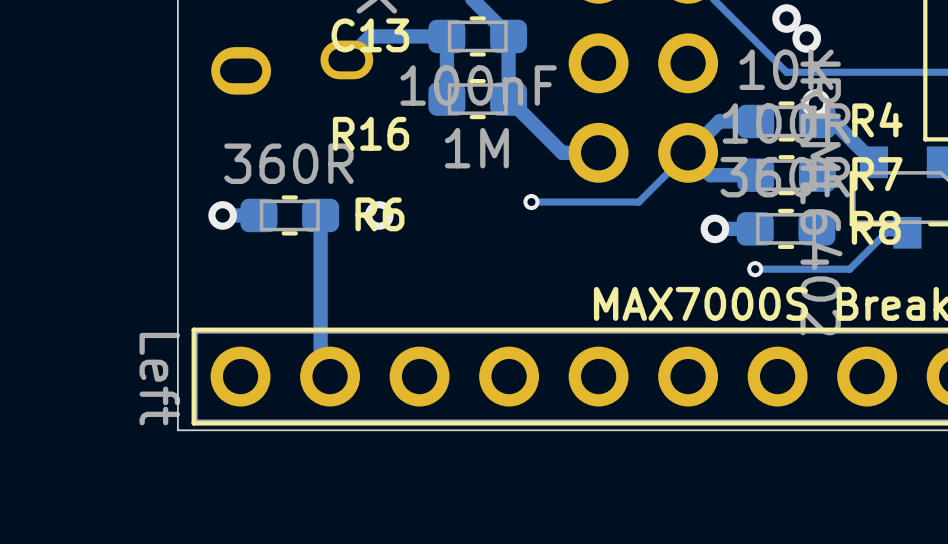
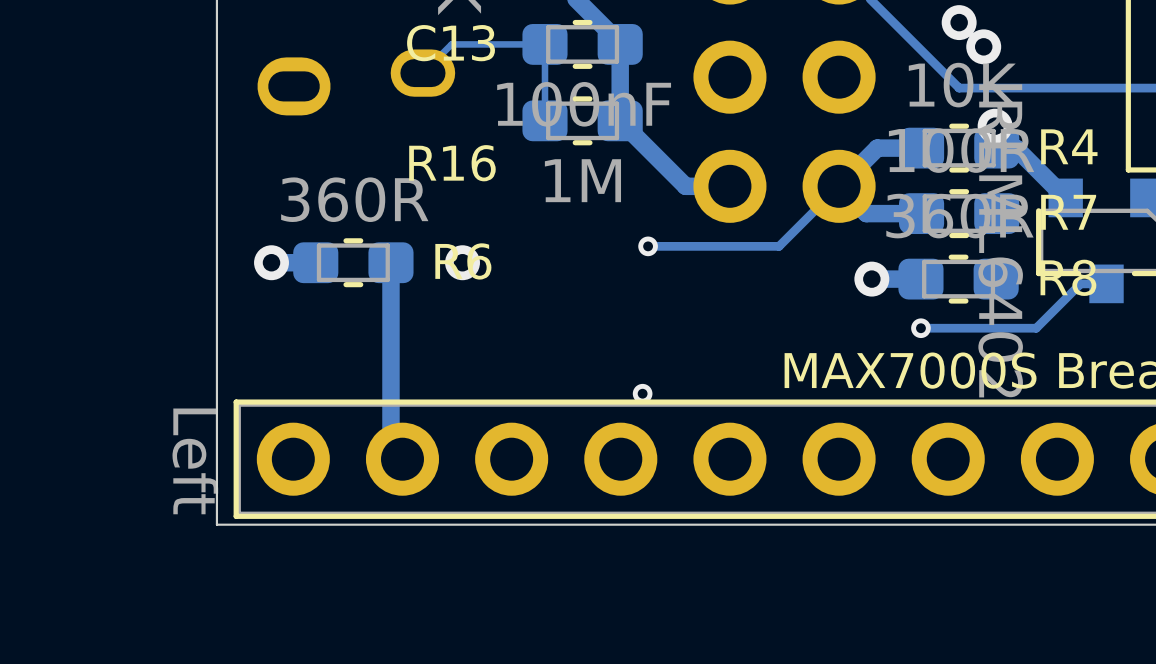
track width: thick (346, 59) (370, 36) (446, 36) (446, 99) -> thin (422, 73) (451, 44) (544, 44) (544, 120)
via: none -> (642, 393)

